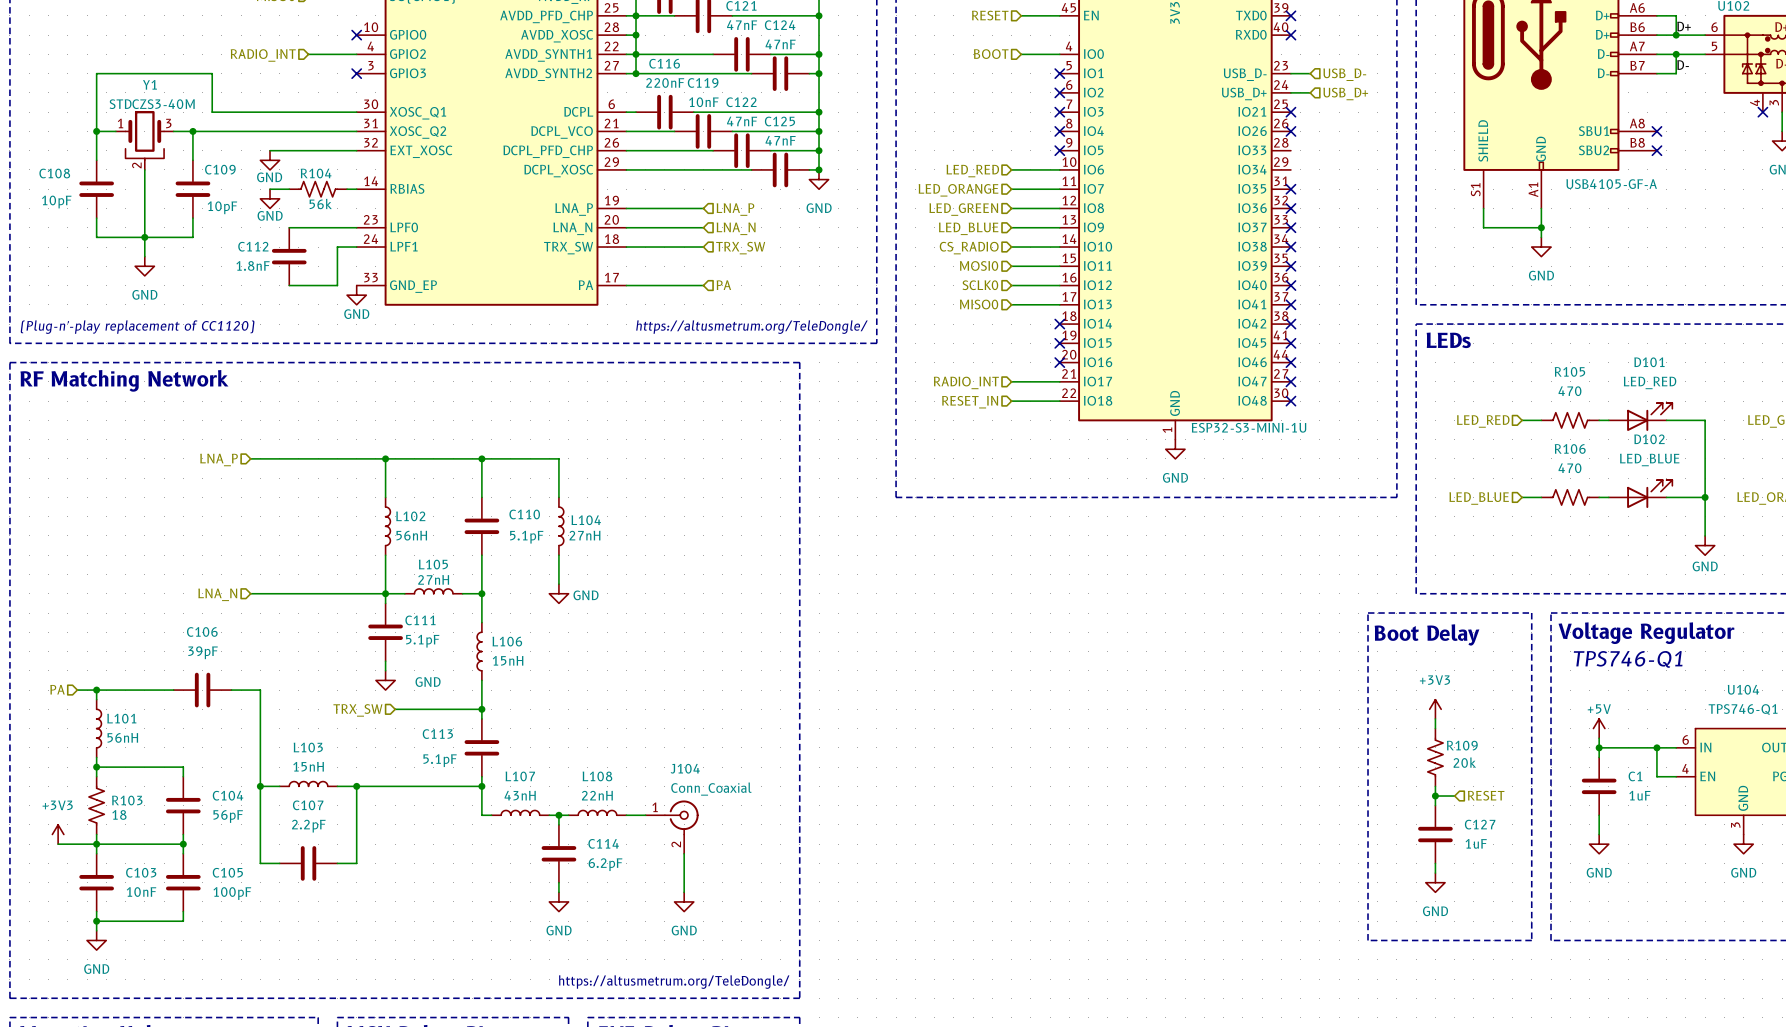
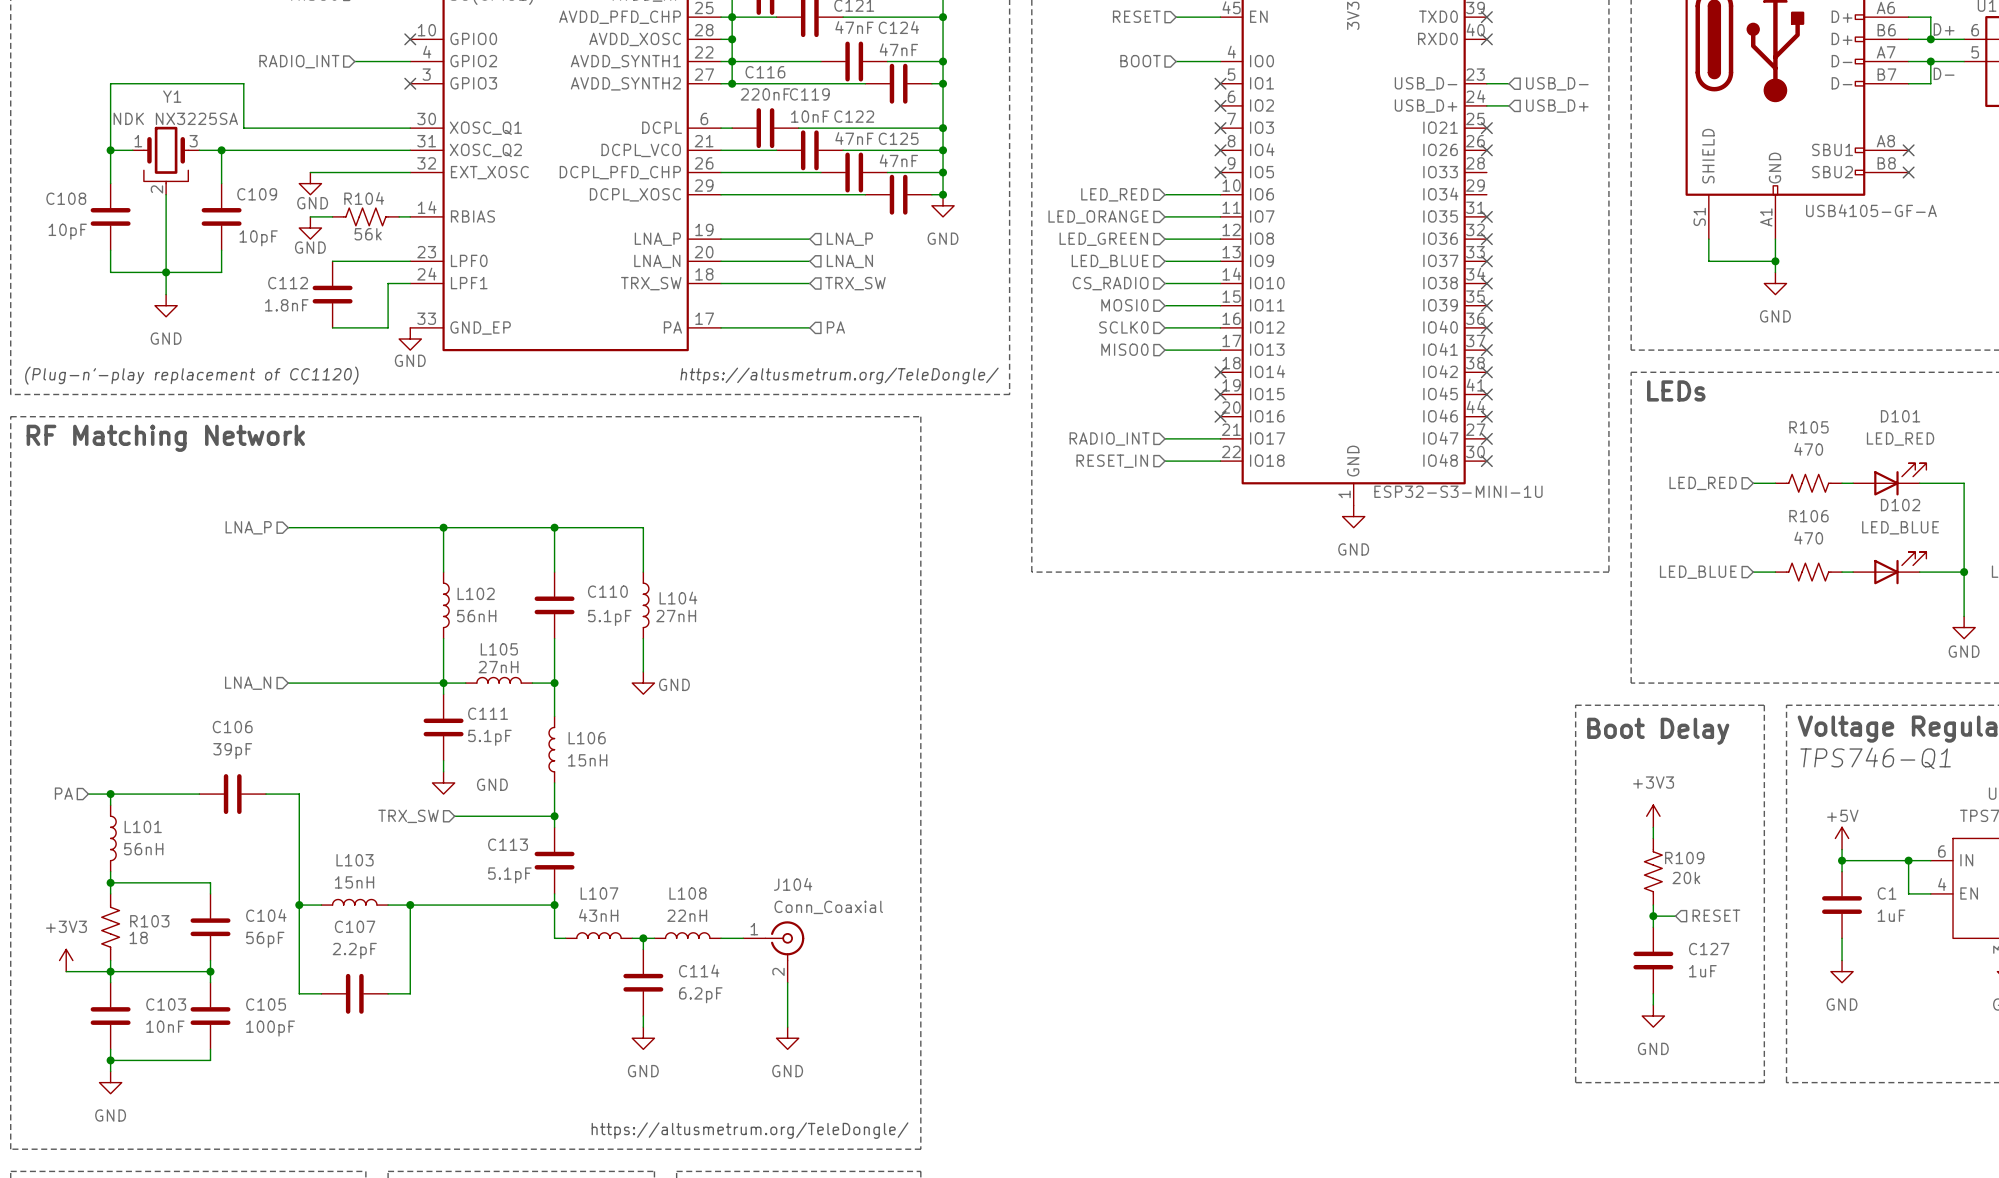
Y1 value: STDCZS3-40M (152, 104) -> NDK NX3225SA (175, 118)

